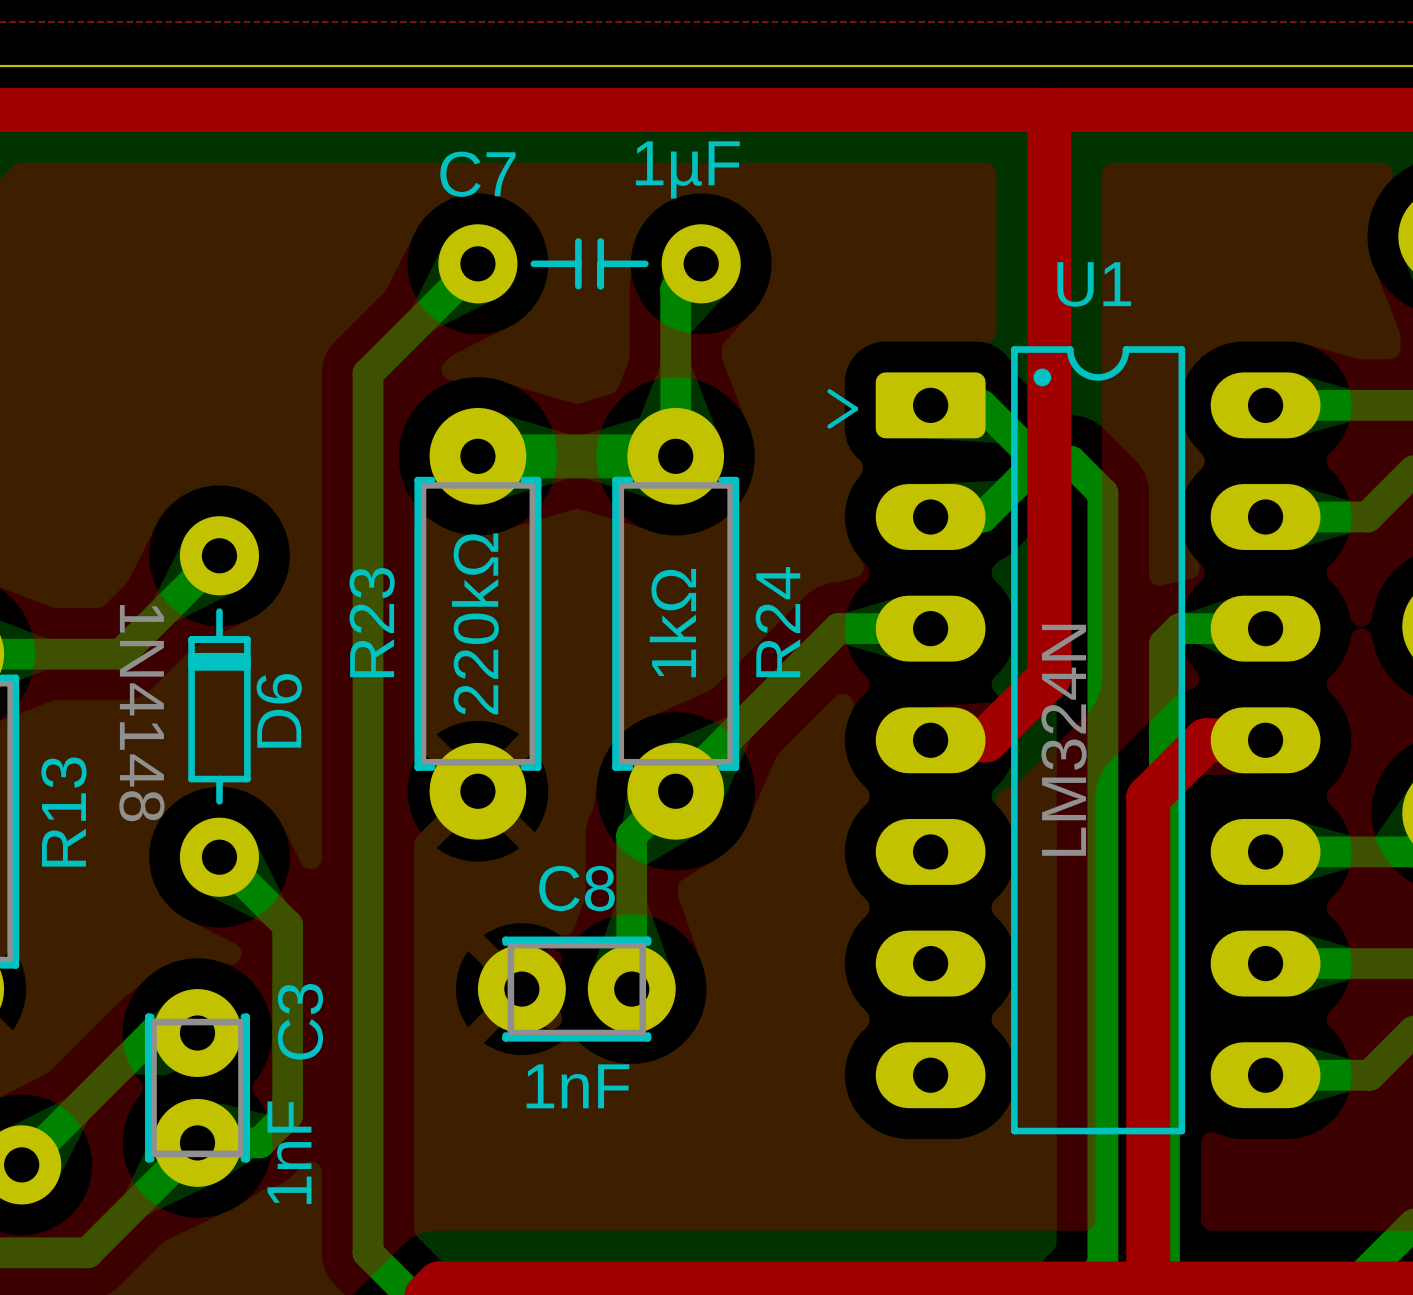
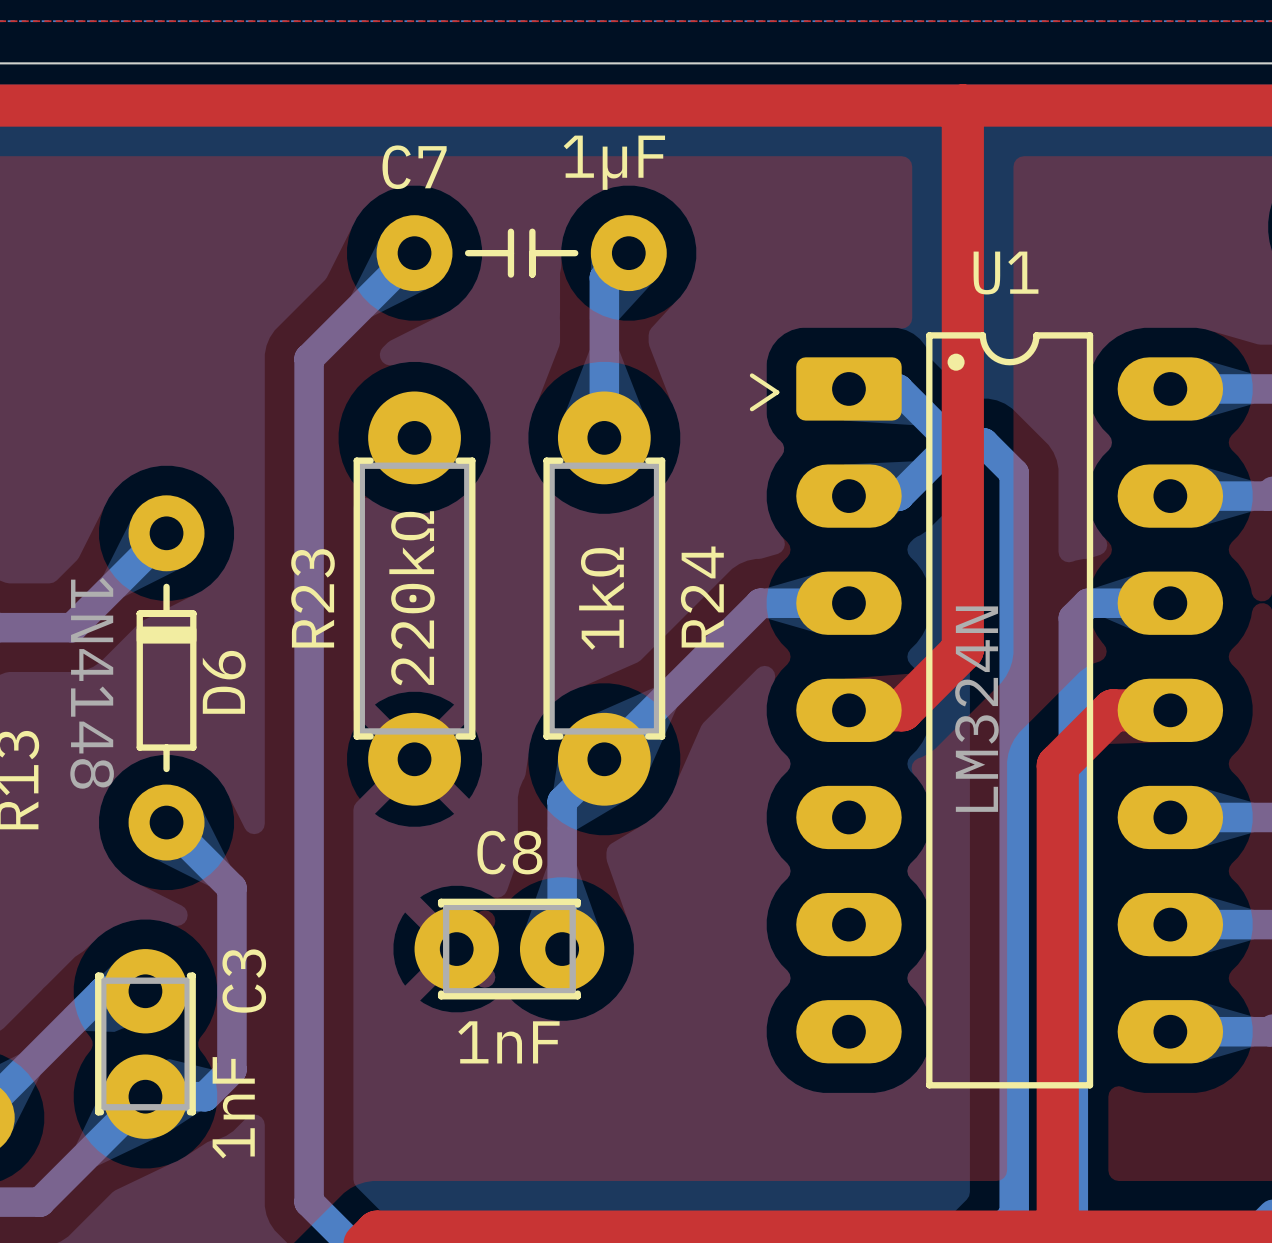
bottom track: (477, 456) (675, 456) -> none

